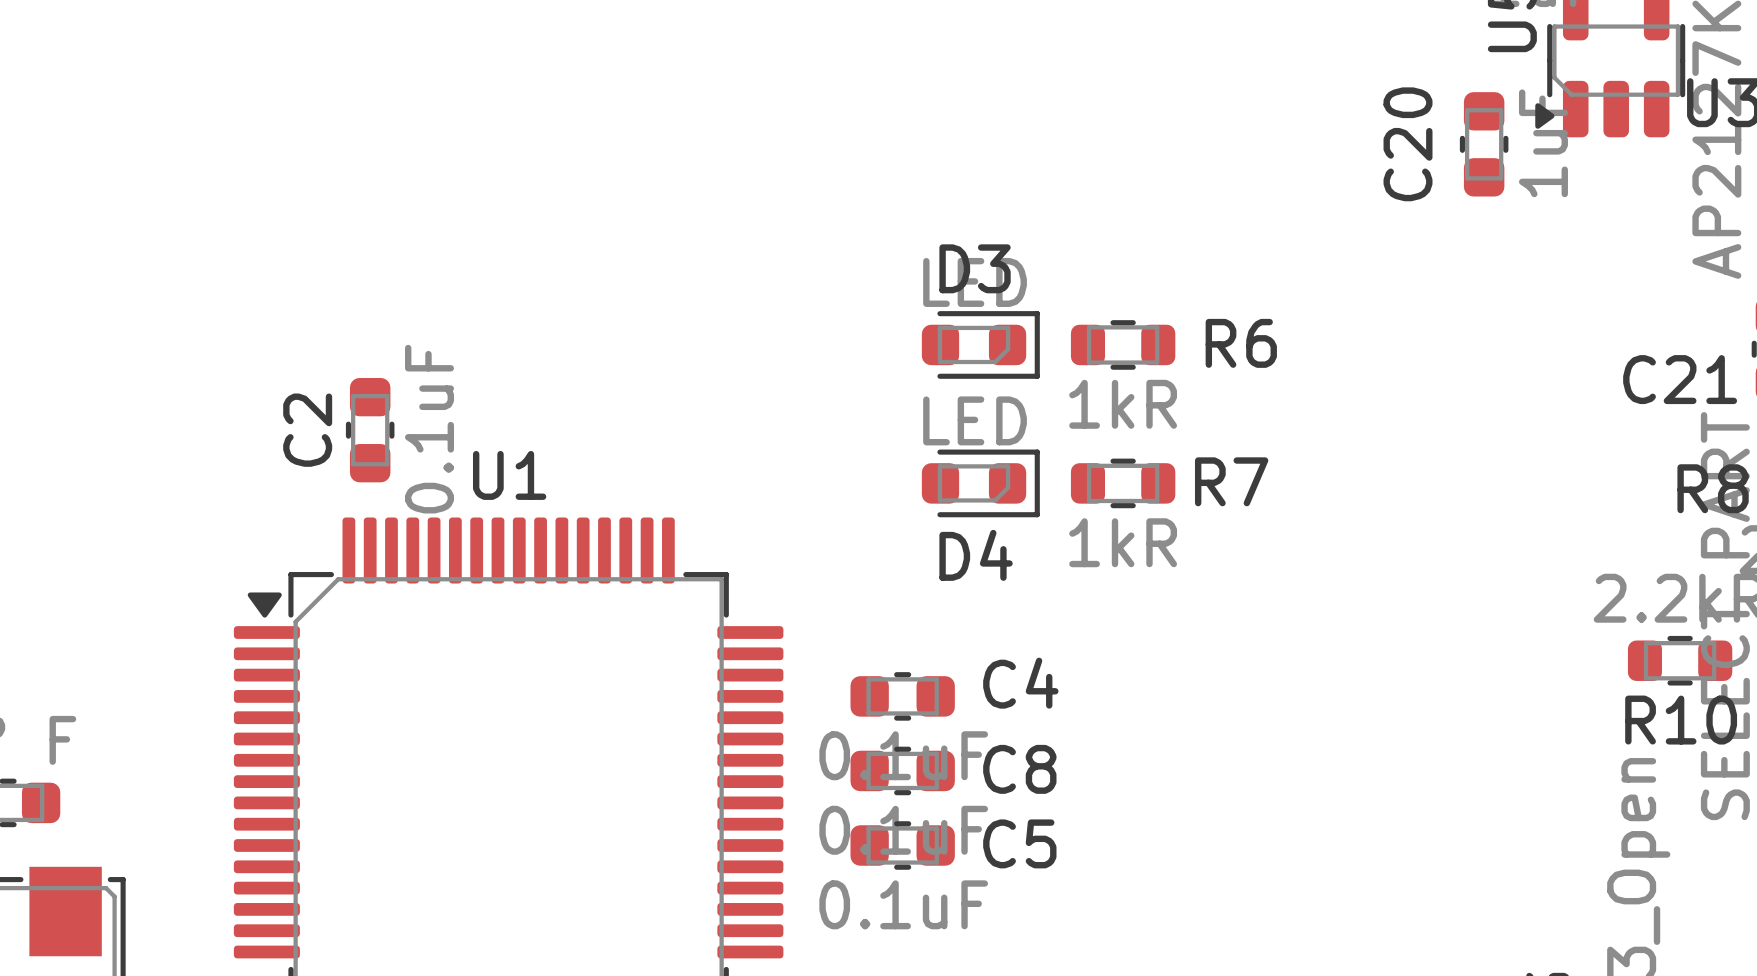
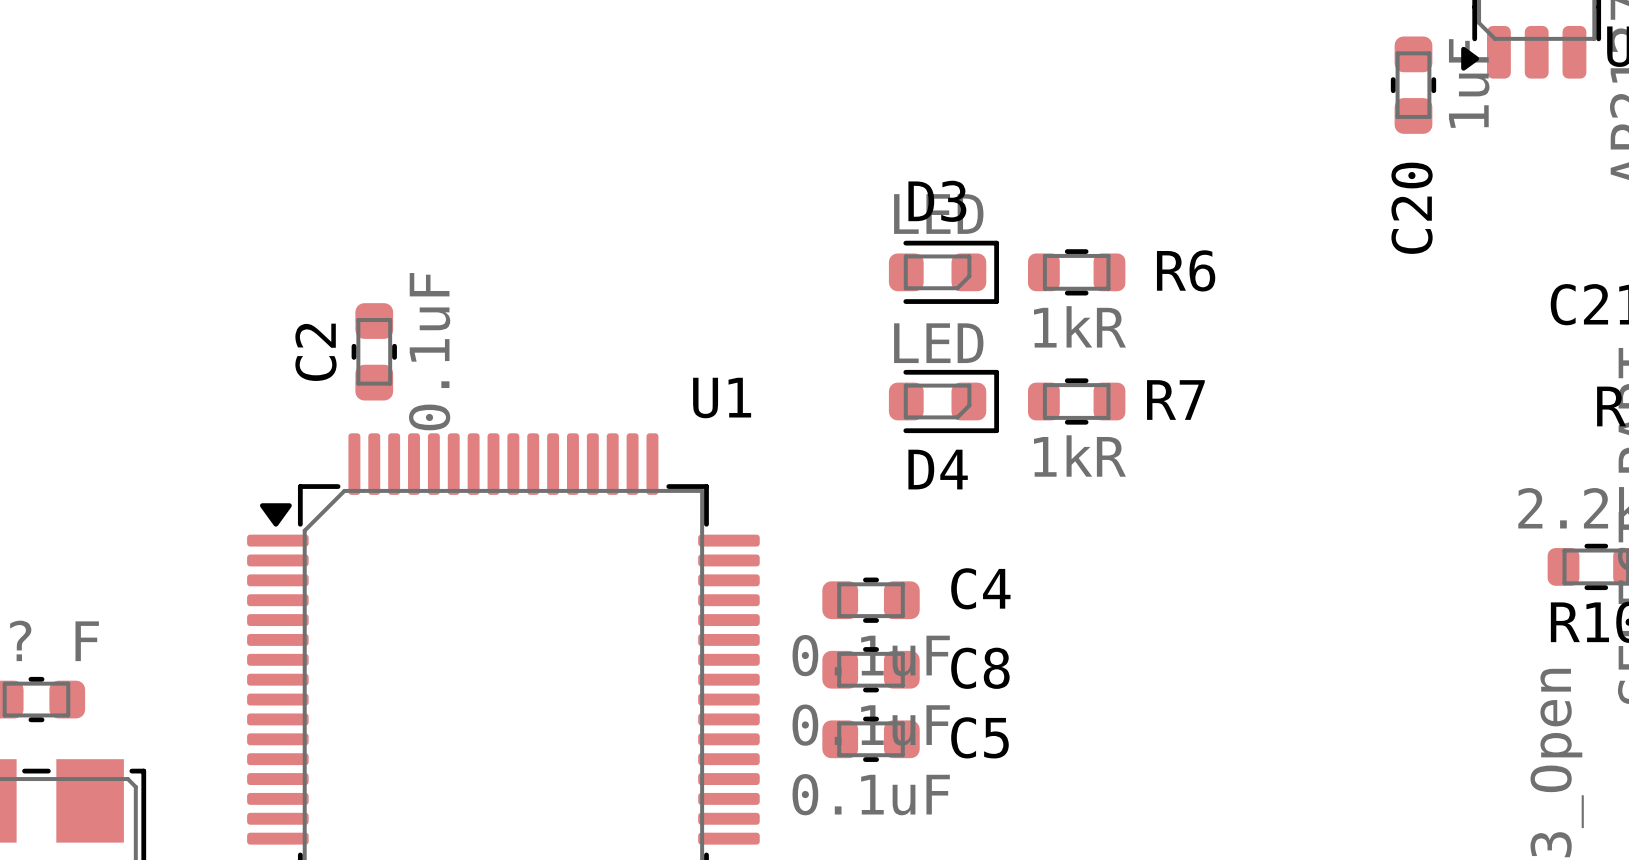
C20 name position: C20 (1408, 144) -> C20 (1412, 208)
U1 name position: U1 (509, 475) -> U1 (722, 398)

